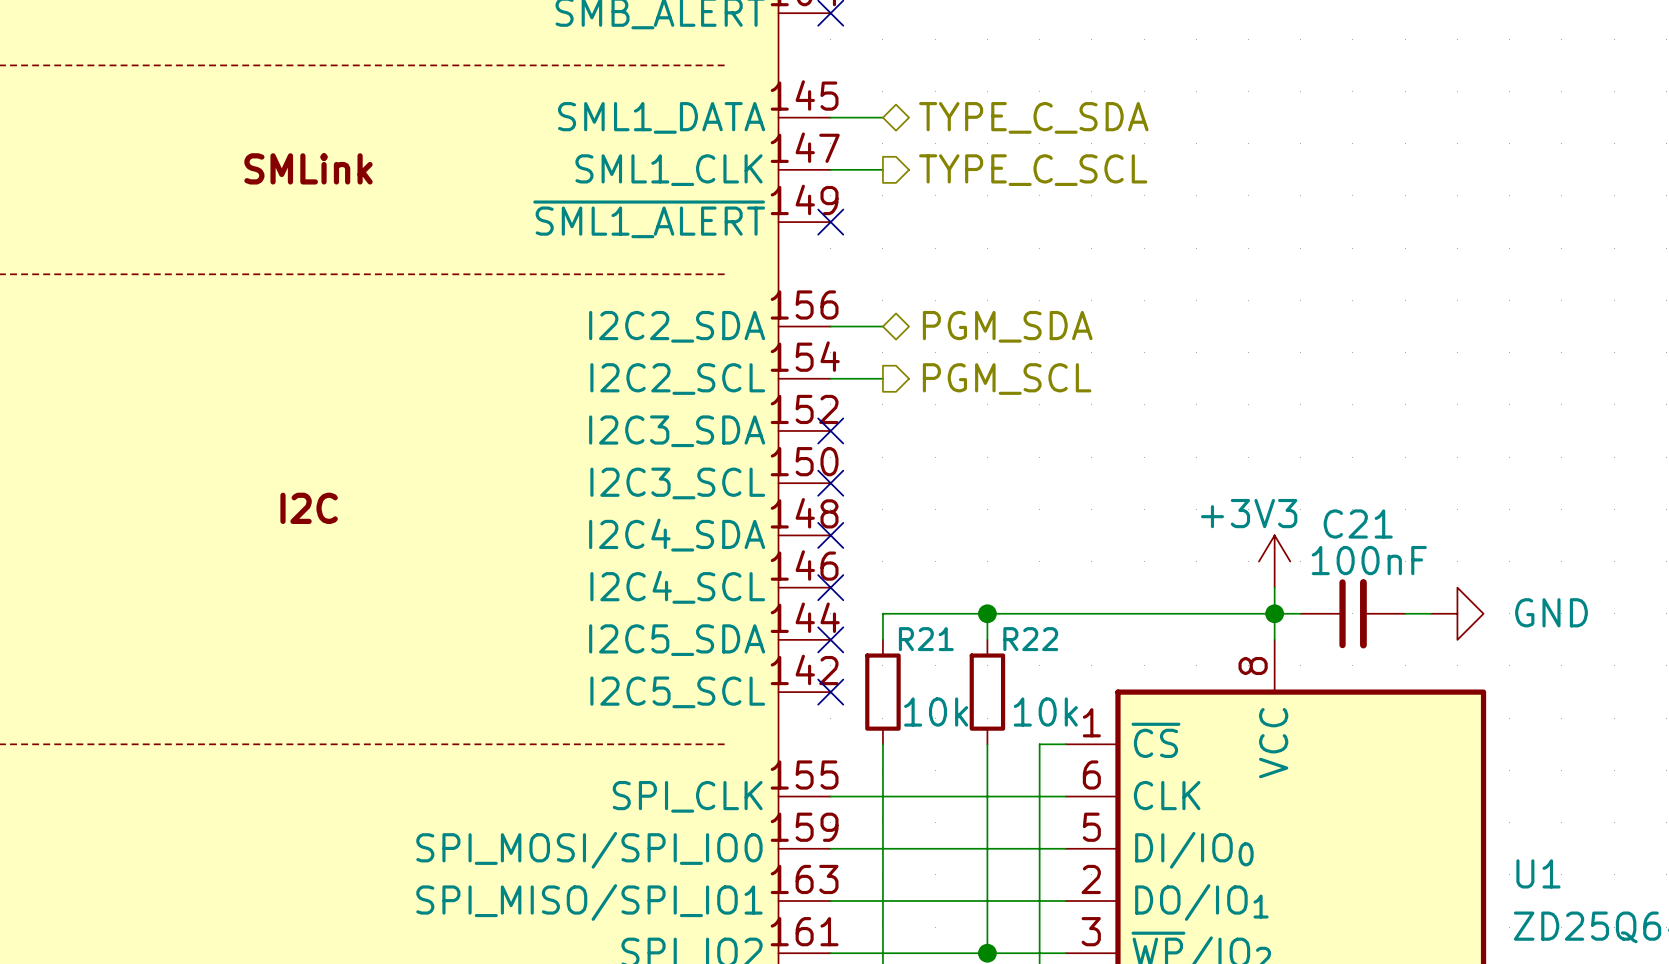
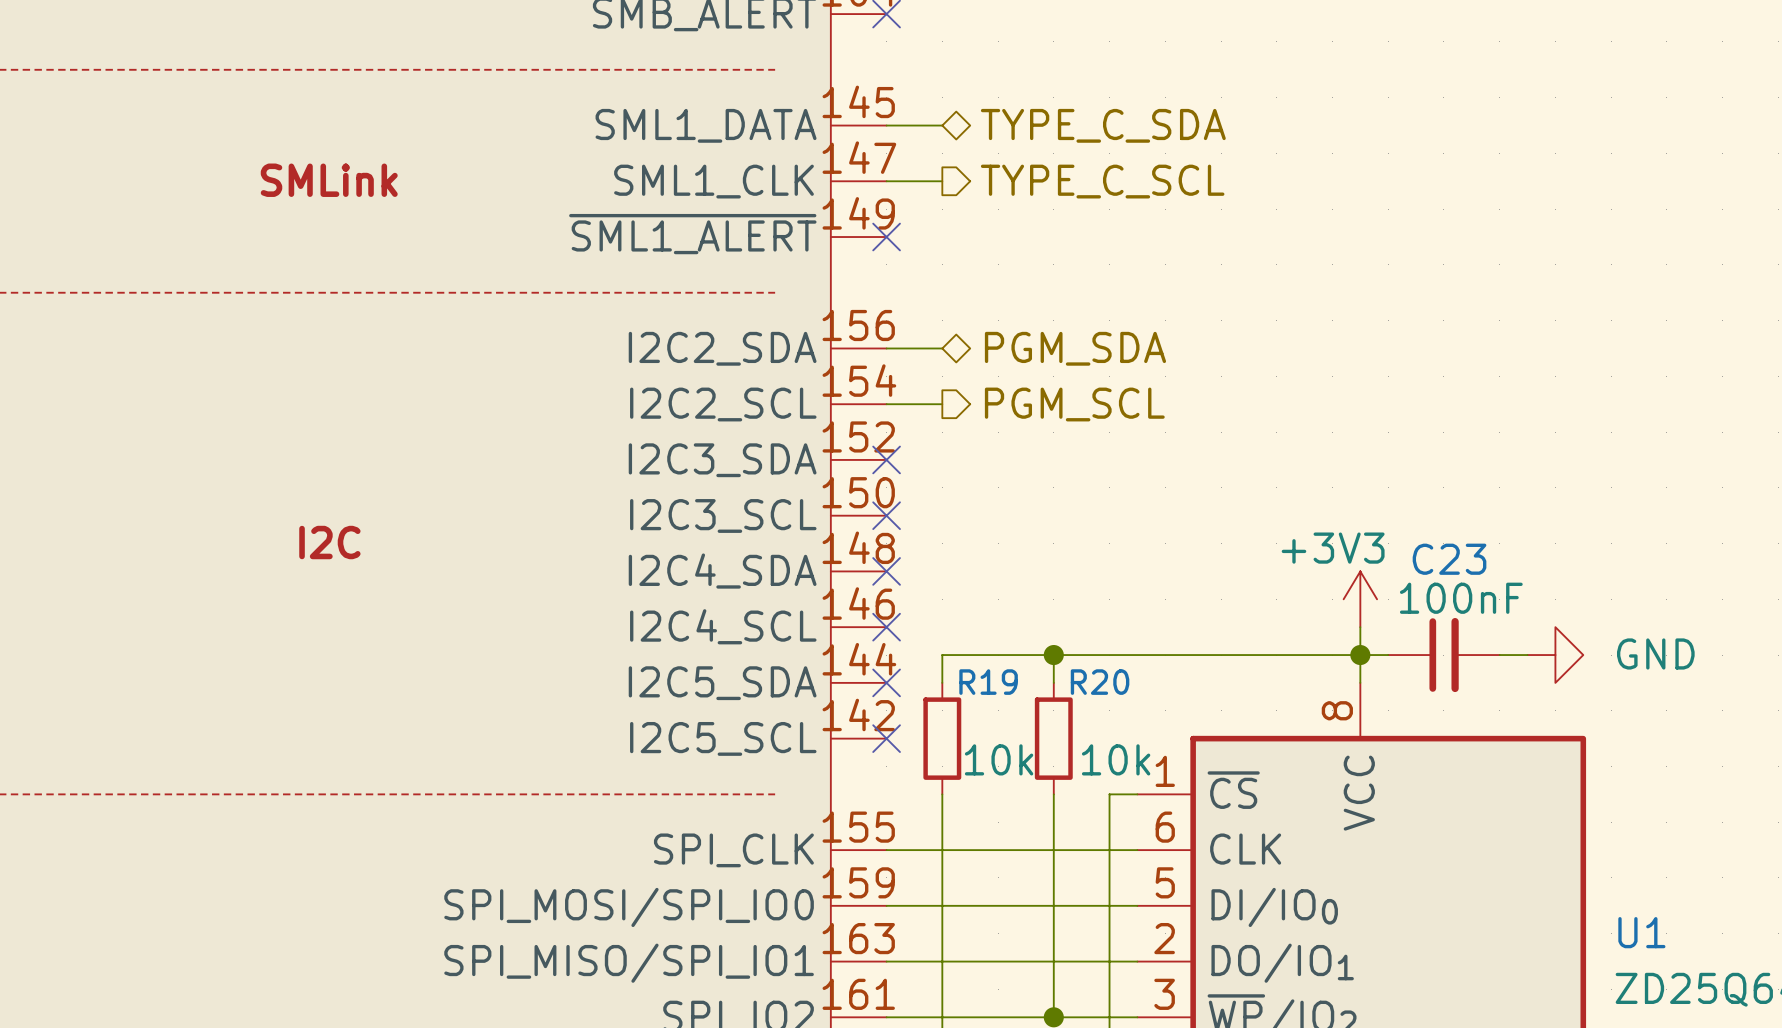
C21 name: C21 (1358, 524) -> C23 (1449, 559)
R21 name: R21 (926, 639) -> R19 (988, 682)
R22 name: R22 (1030, 639) -> R20 (1100, 682)

